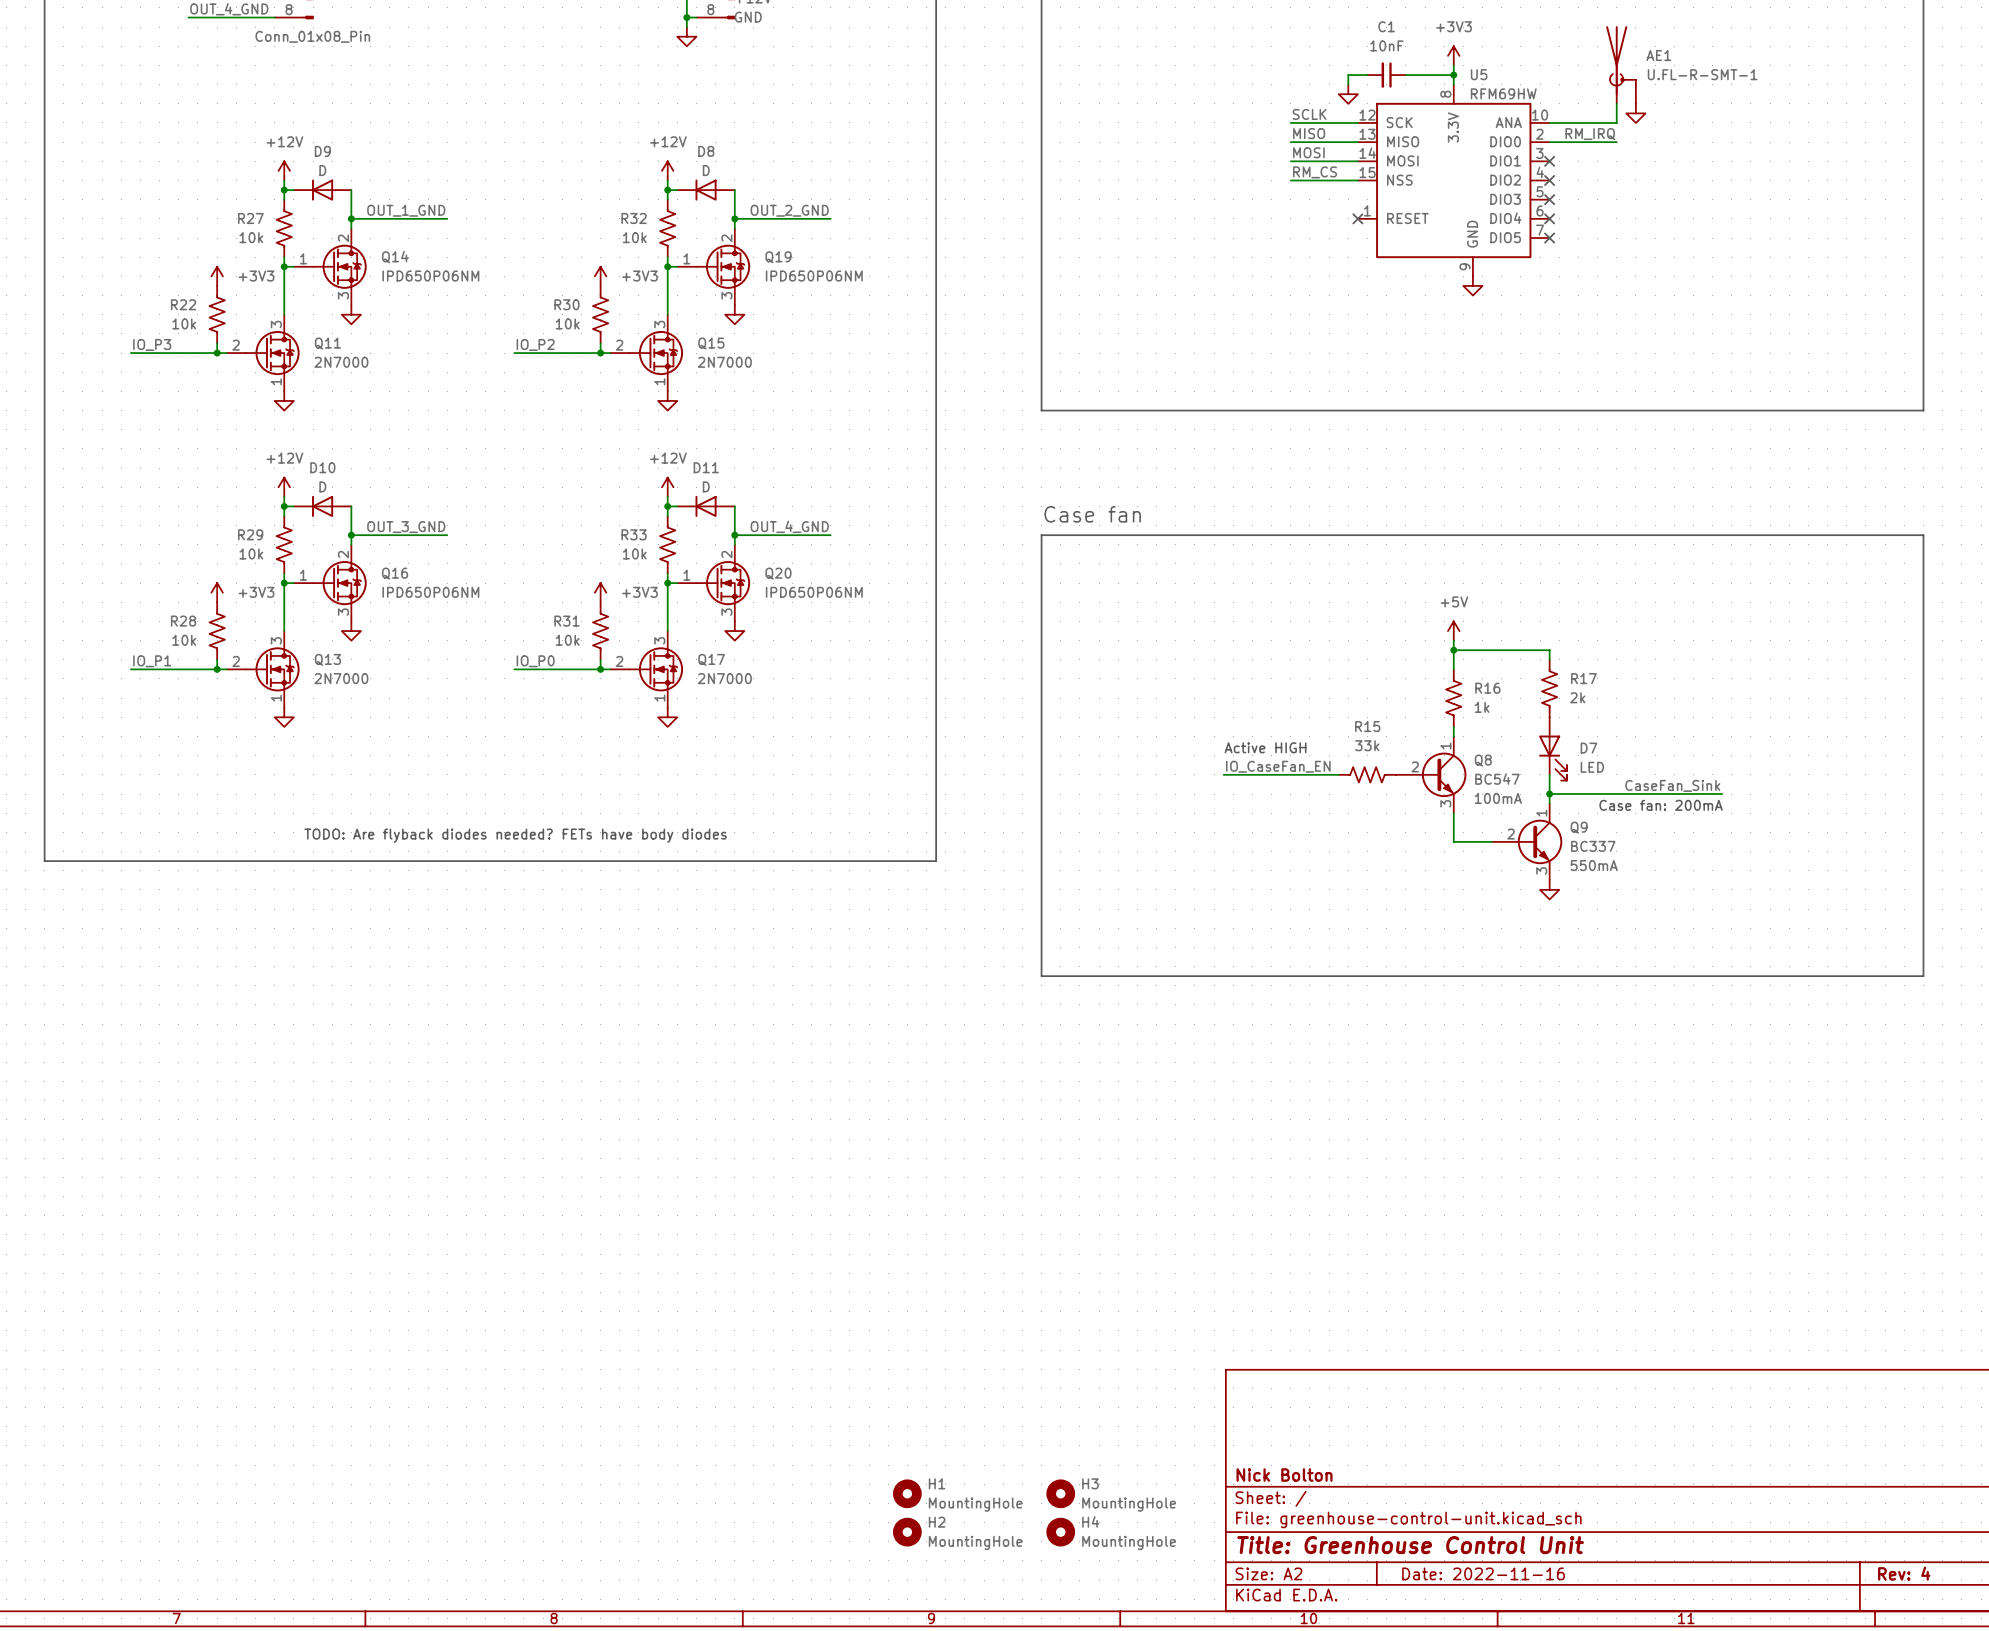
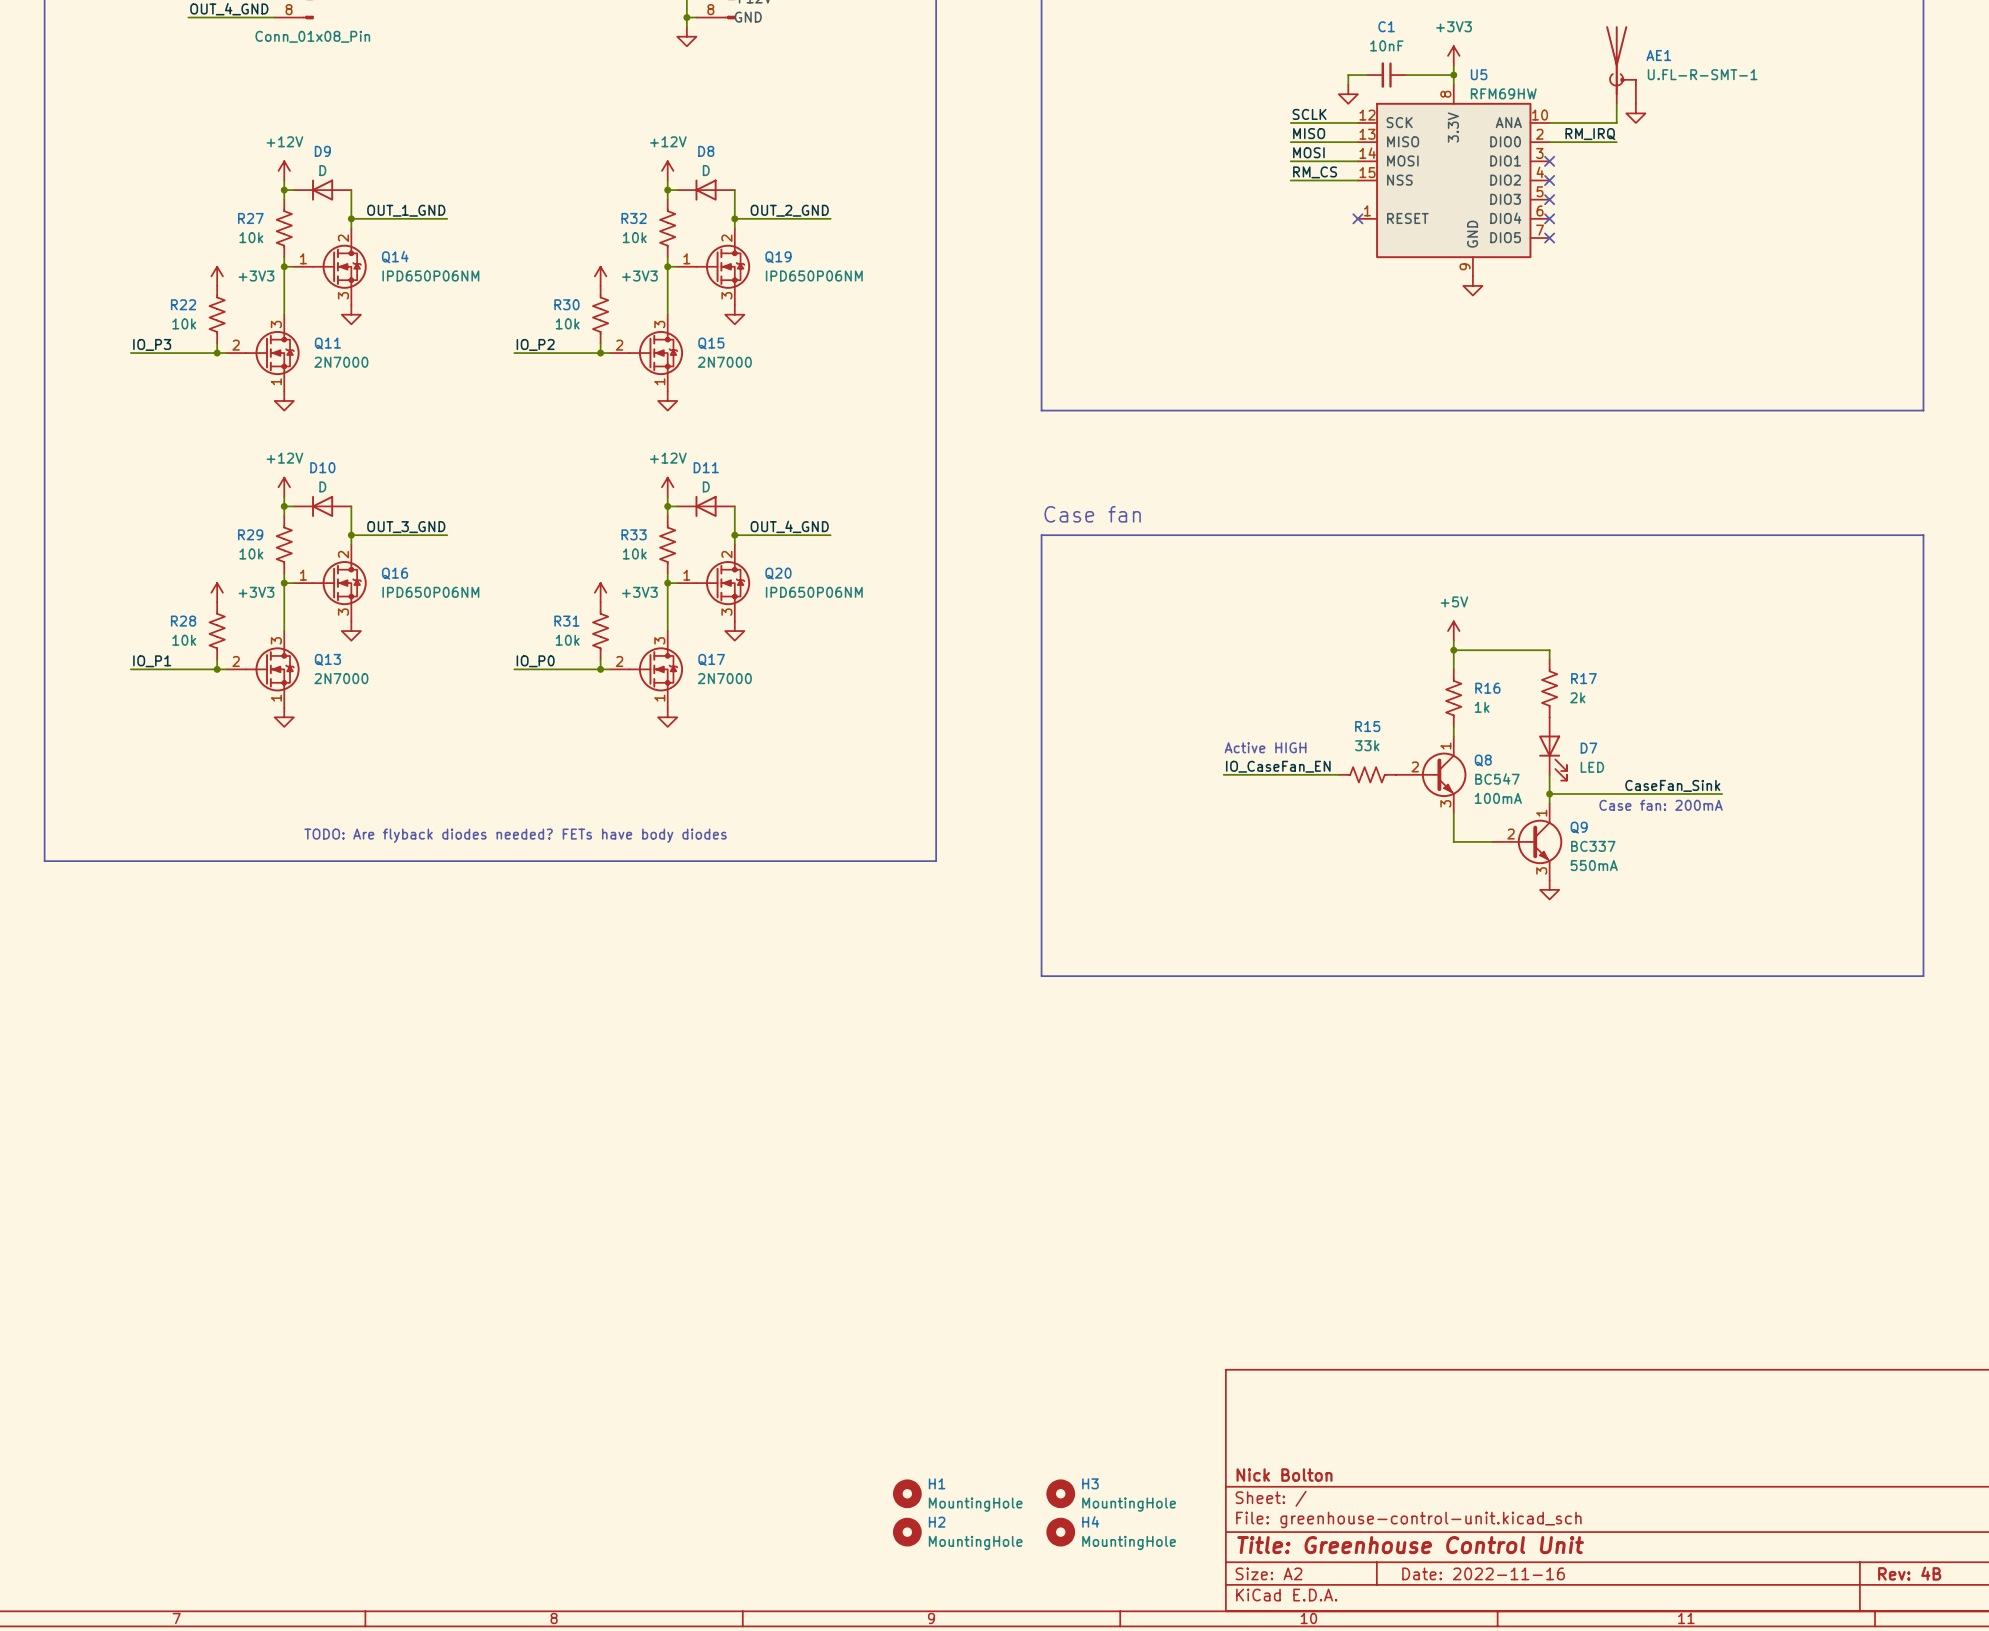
title block: Rev: 4 (1904, 1573) -> Rev: 4B (1909, 1573)

